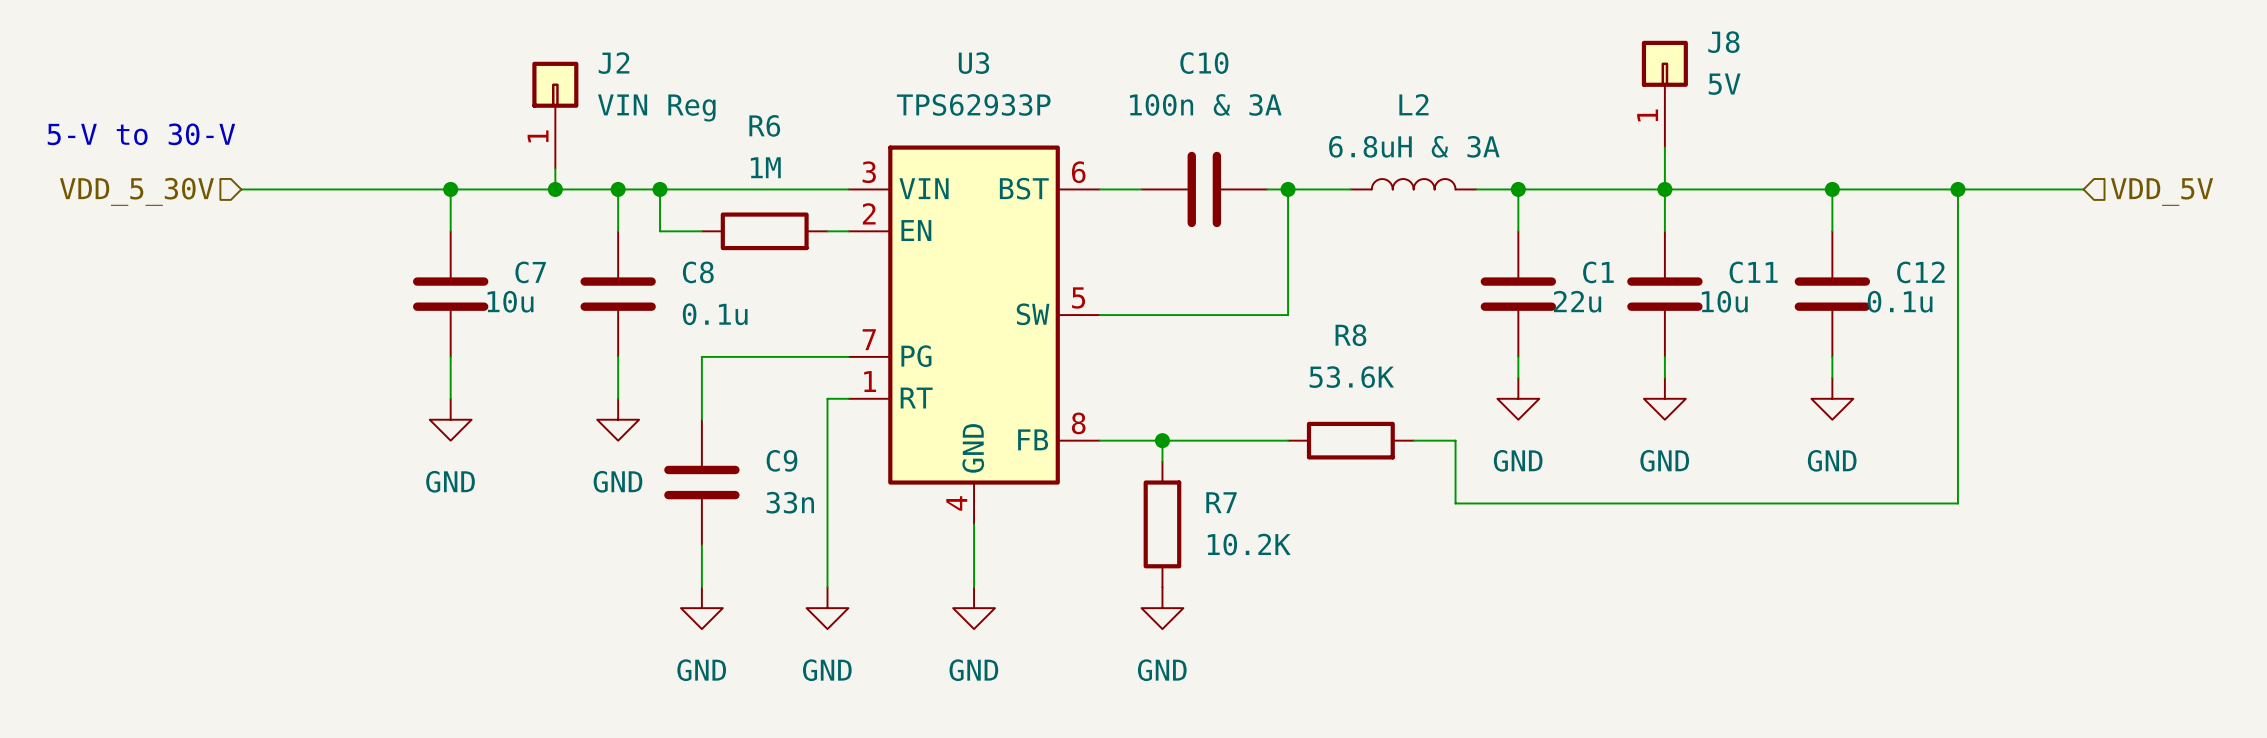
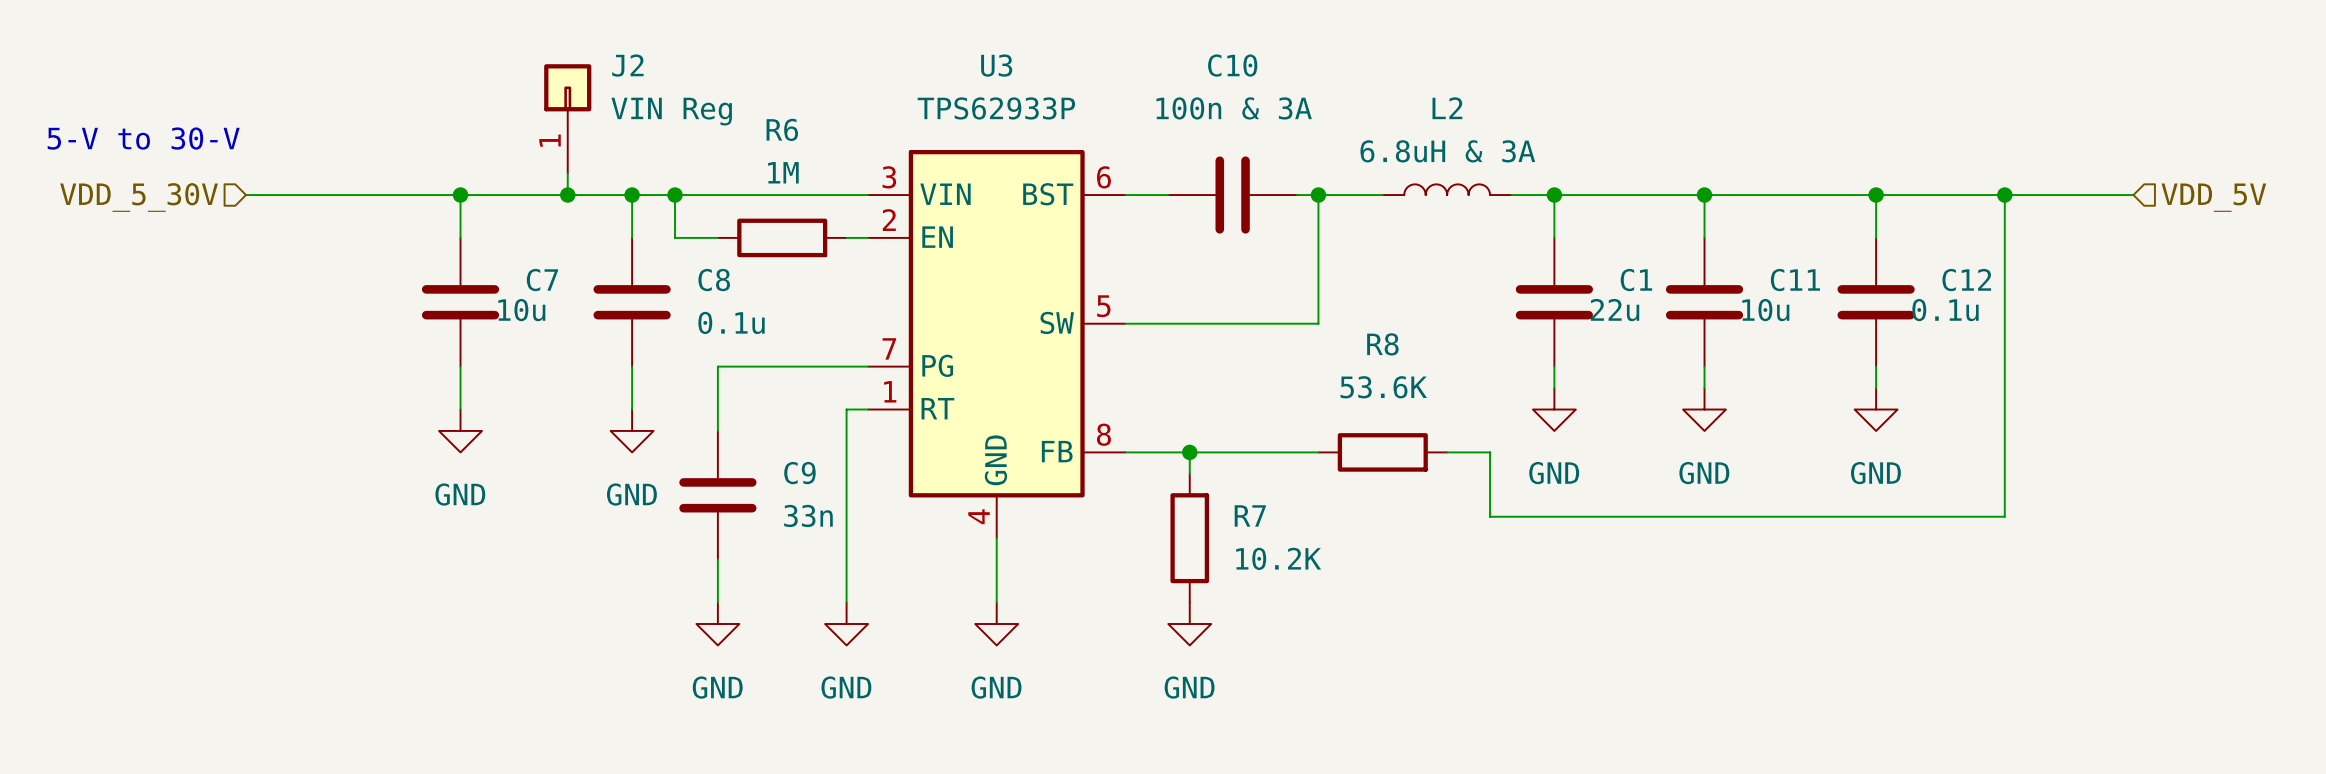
J8: 5V (1664, 94) -> none
wire: (1664, 147) (1664, 189) -> none

